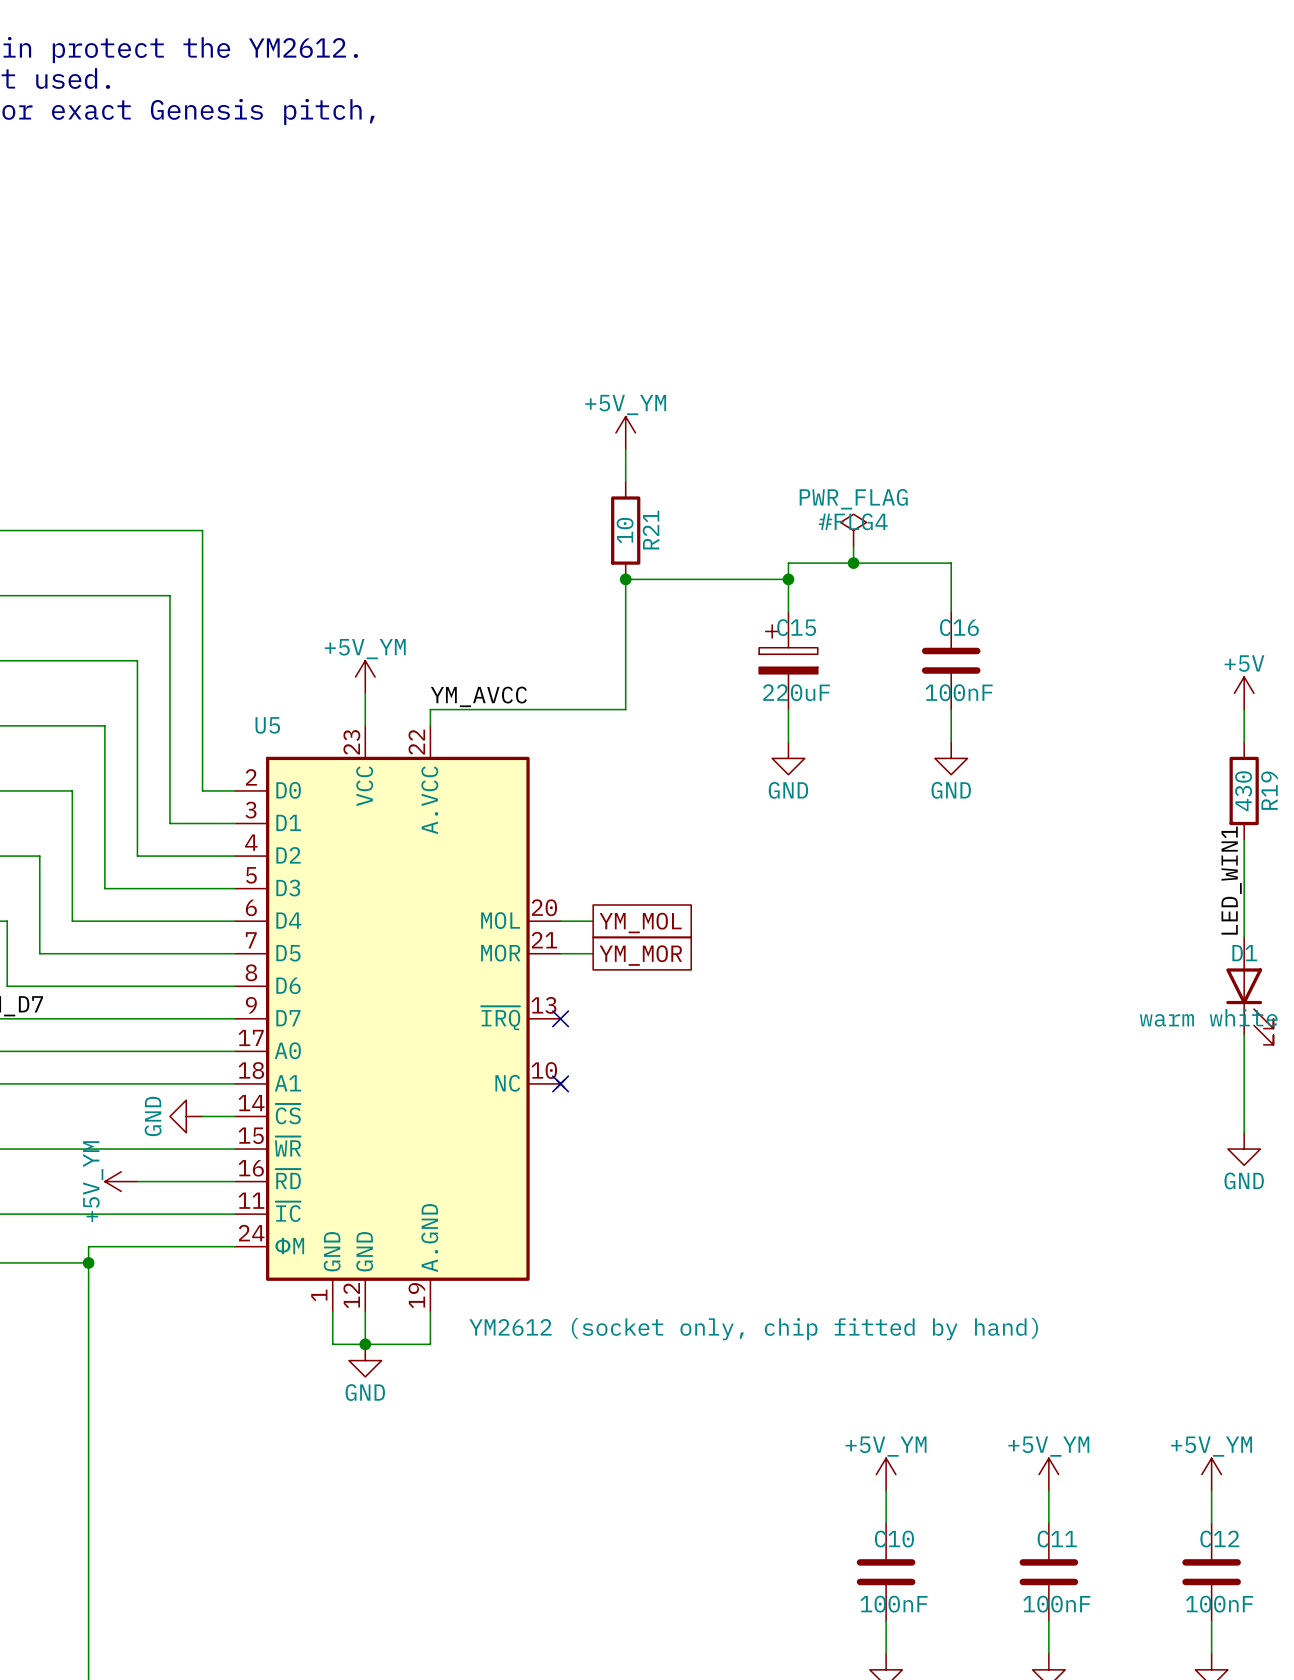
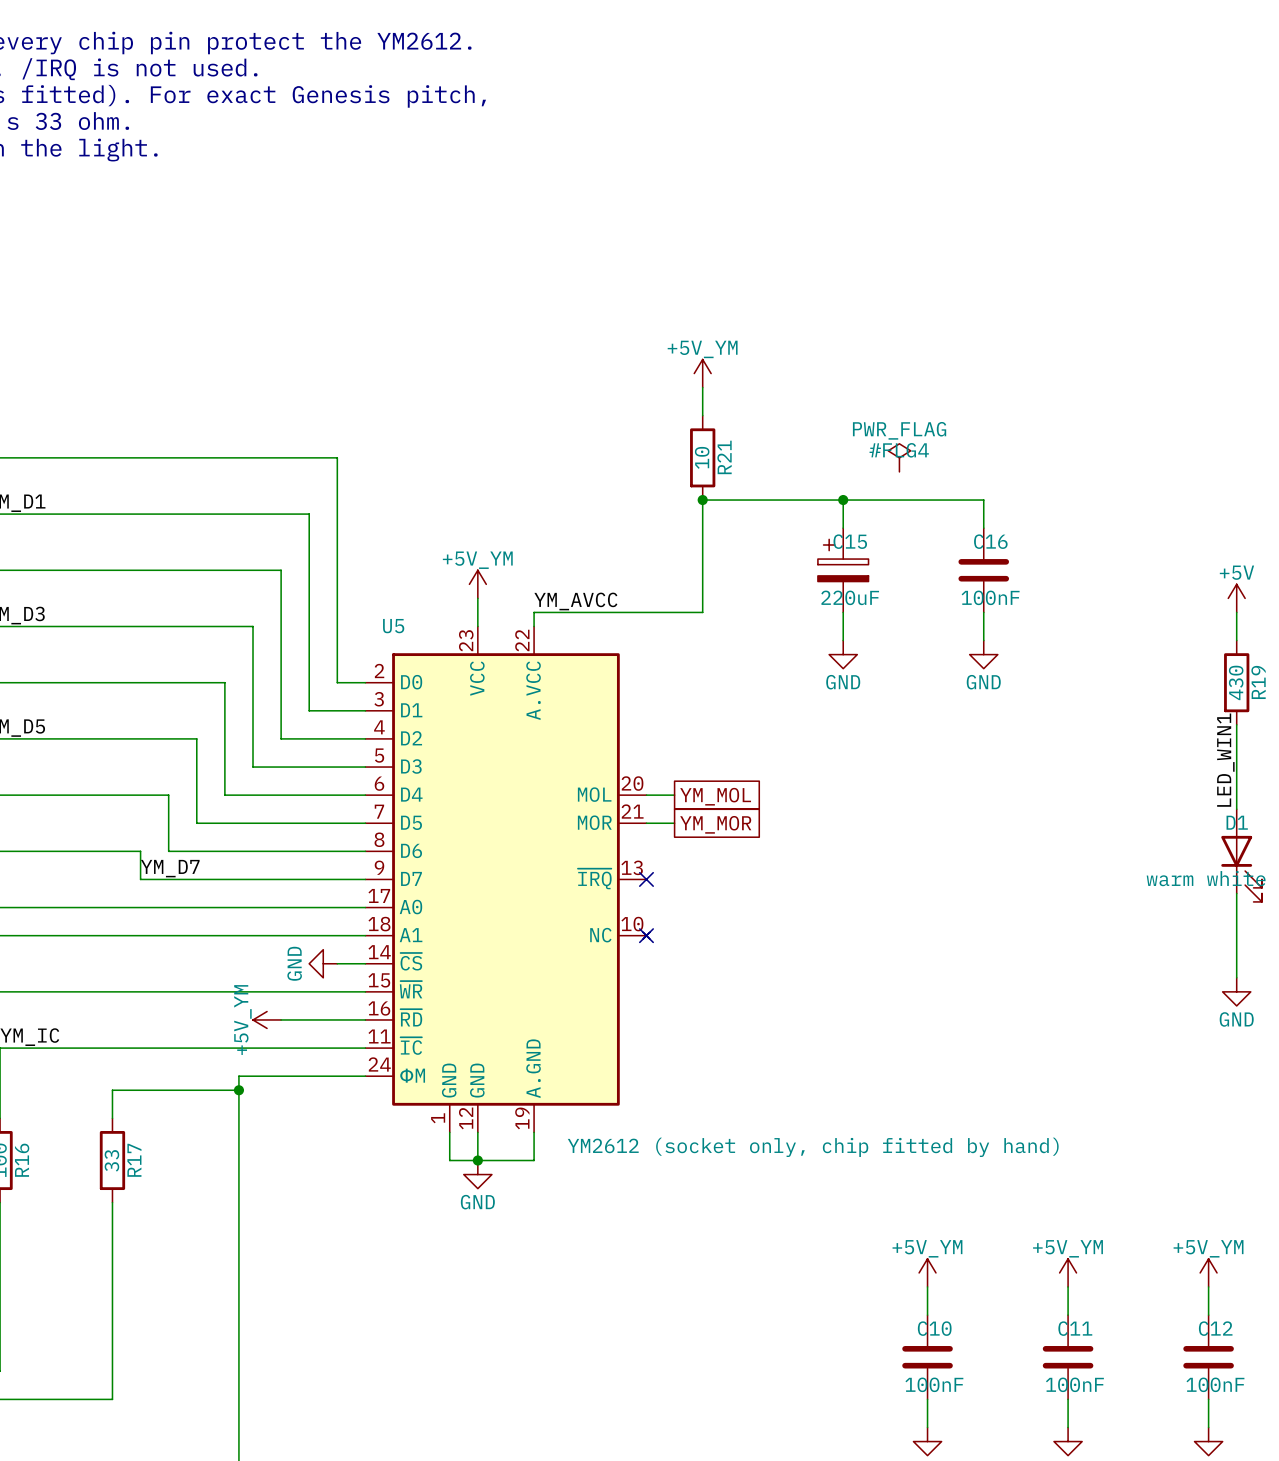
wire: (853, 546) (853, 563) -> none
junction: (853, 563) -> none
wire: (788, 579) (788, 563) (951, 563) (951, 579) -> (843, 500) (983, 500)

